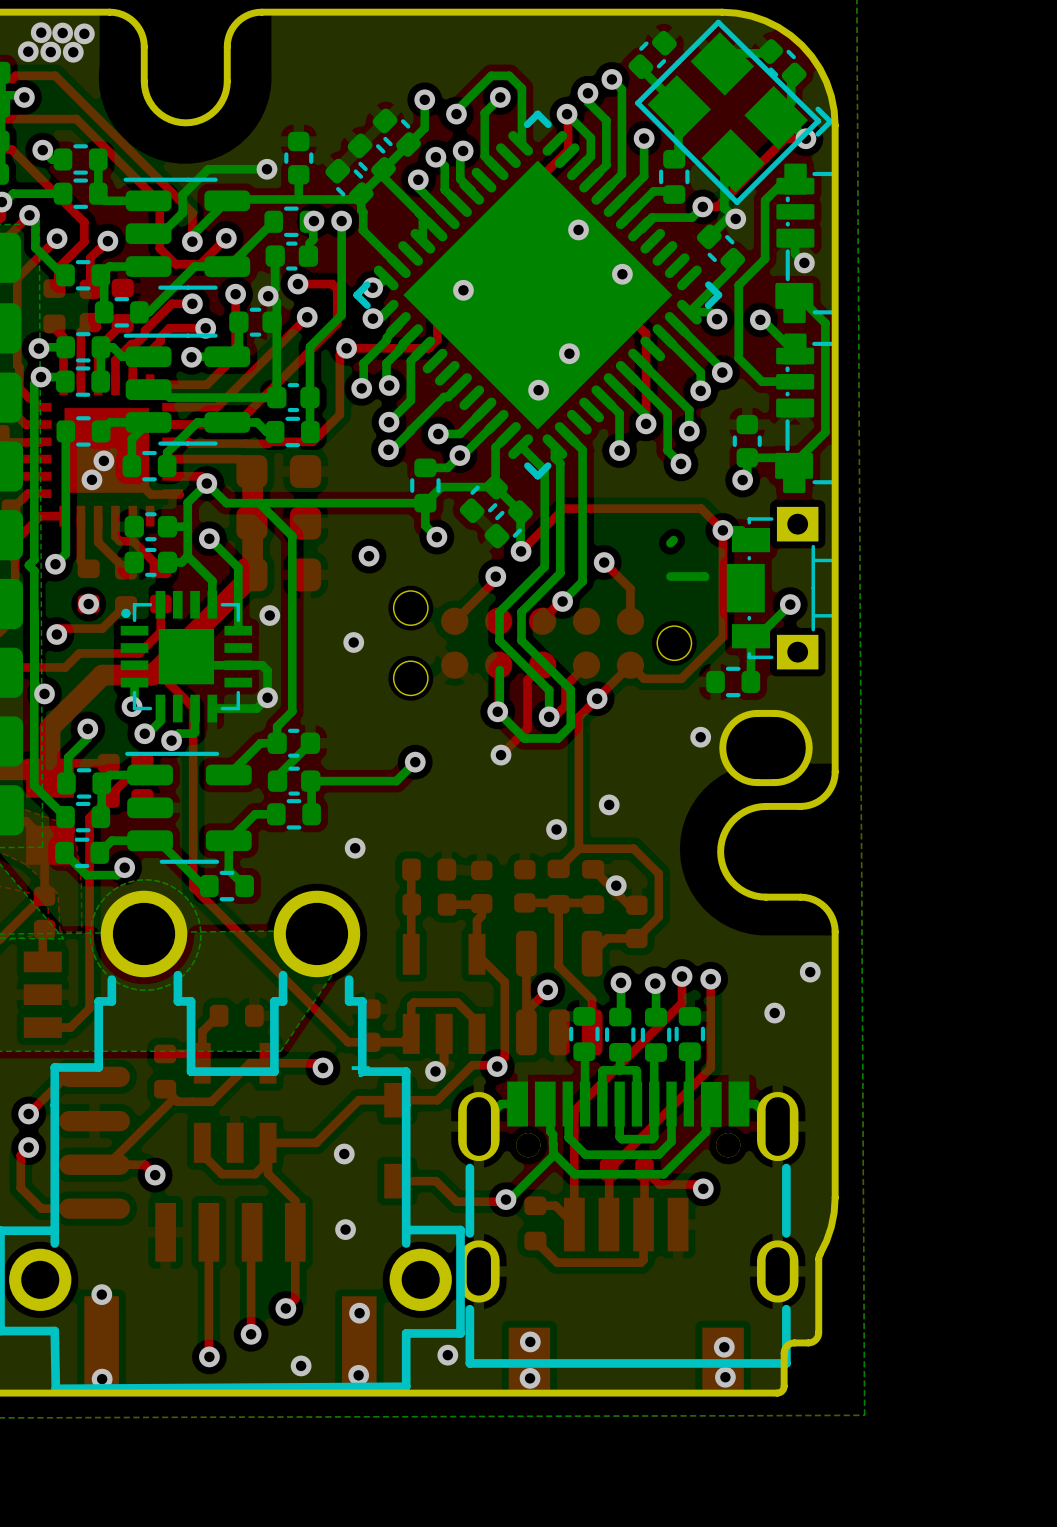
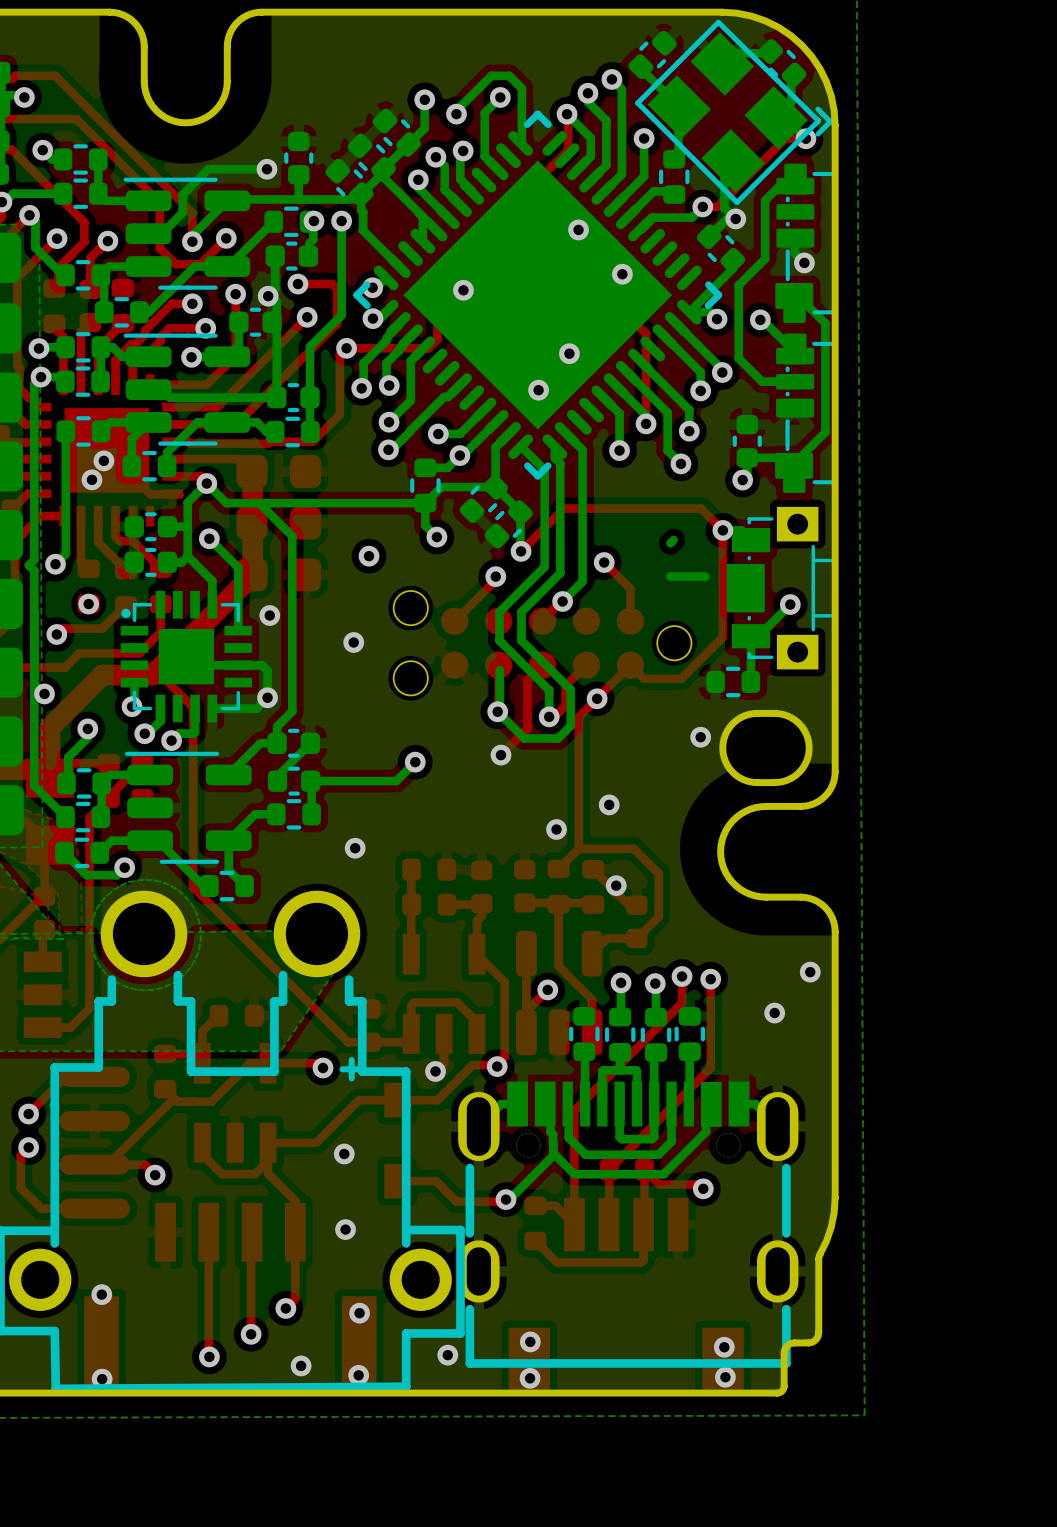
via: (41, 32) -> none
via: (62, 33) -> none
via: (84, 33) -> none
via: (28, 51) -> none
via: (50, 52) -> none
via: (73, 52) -> none

